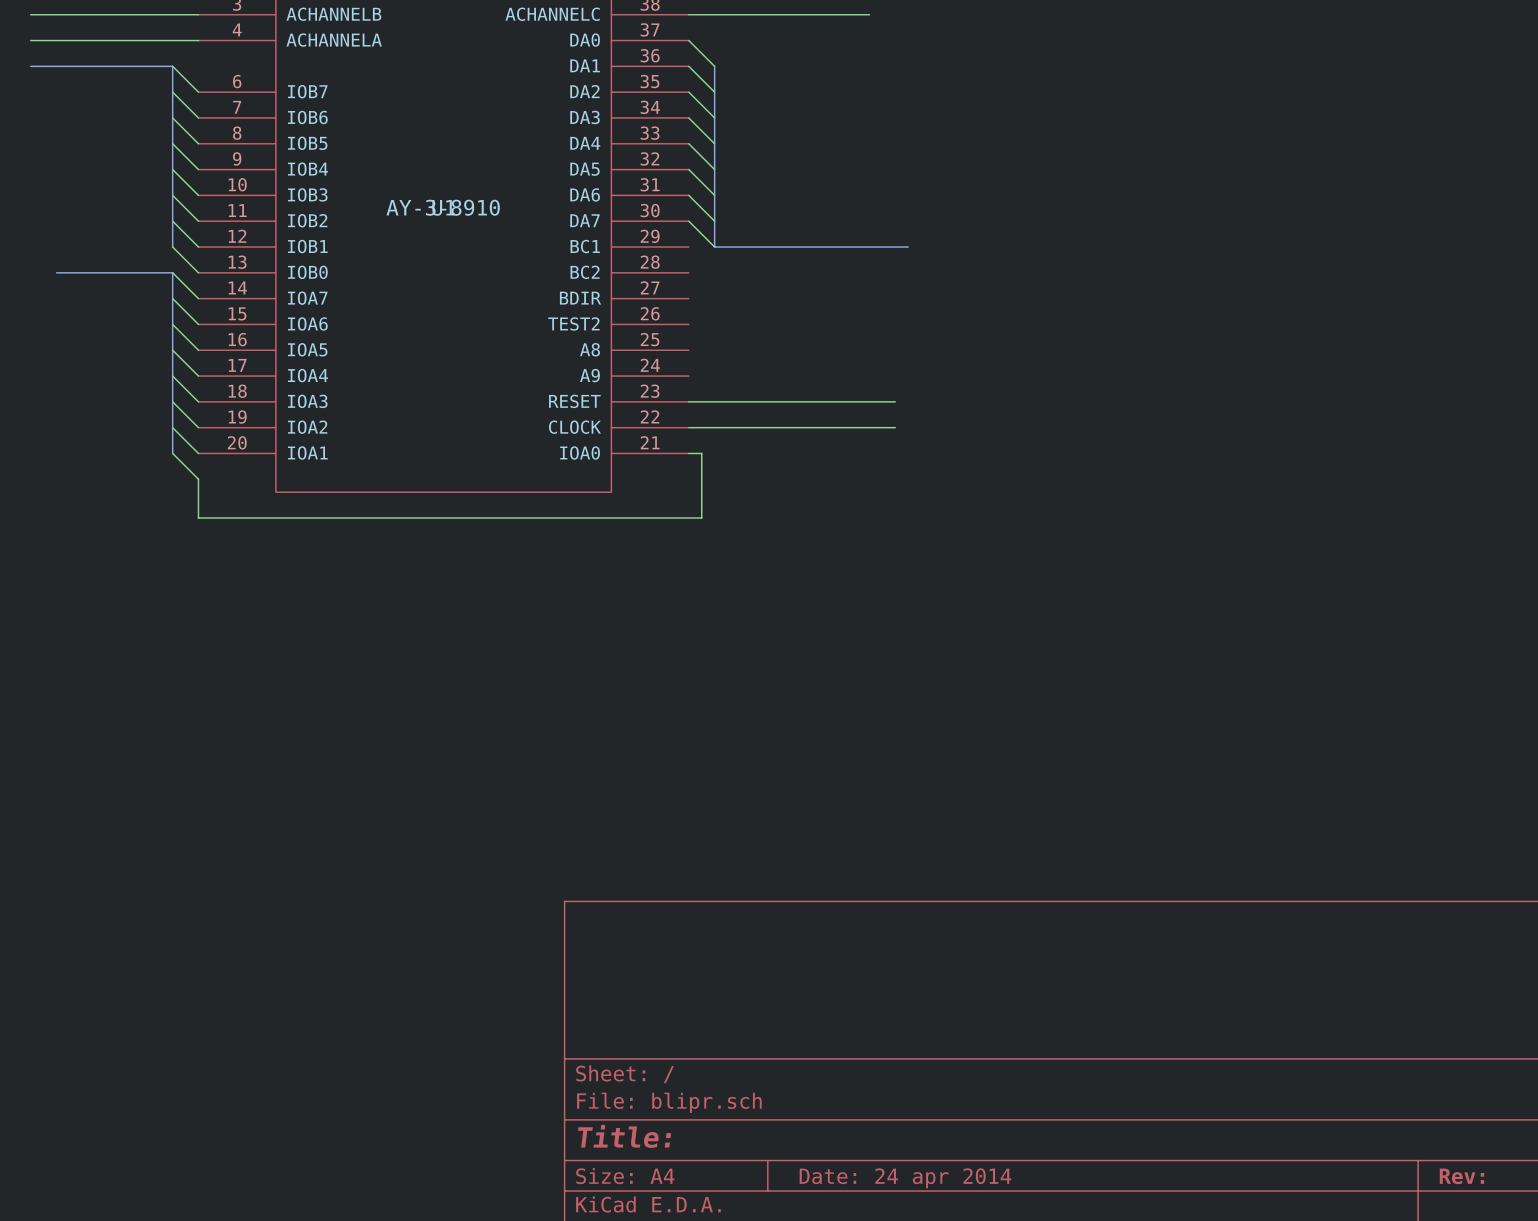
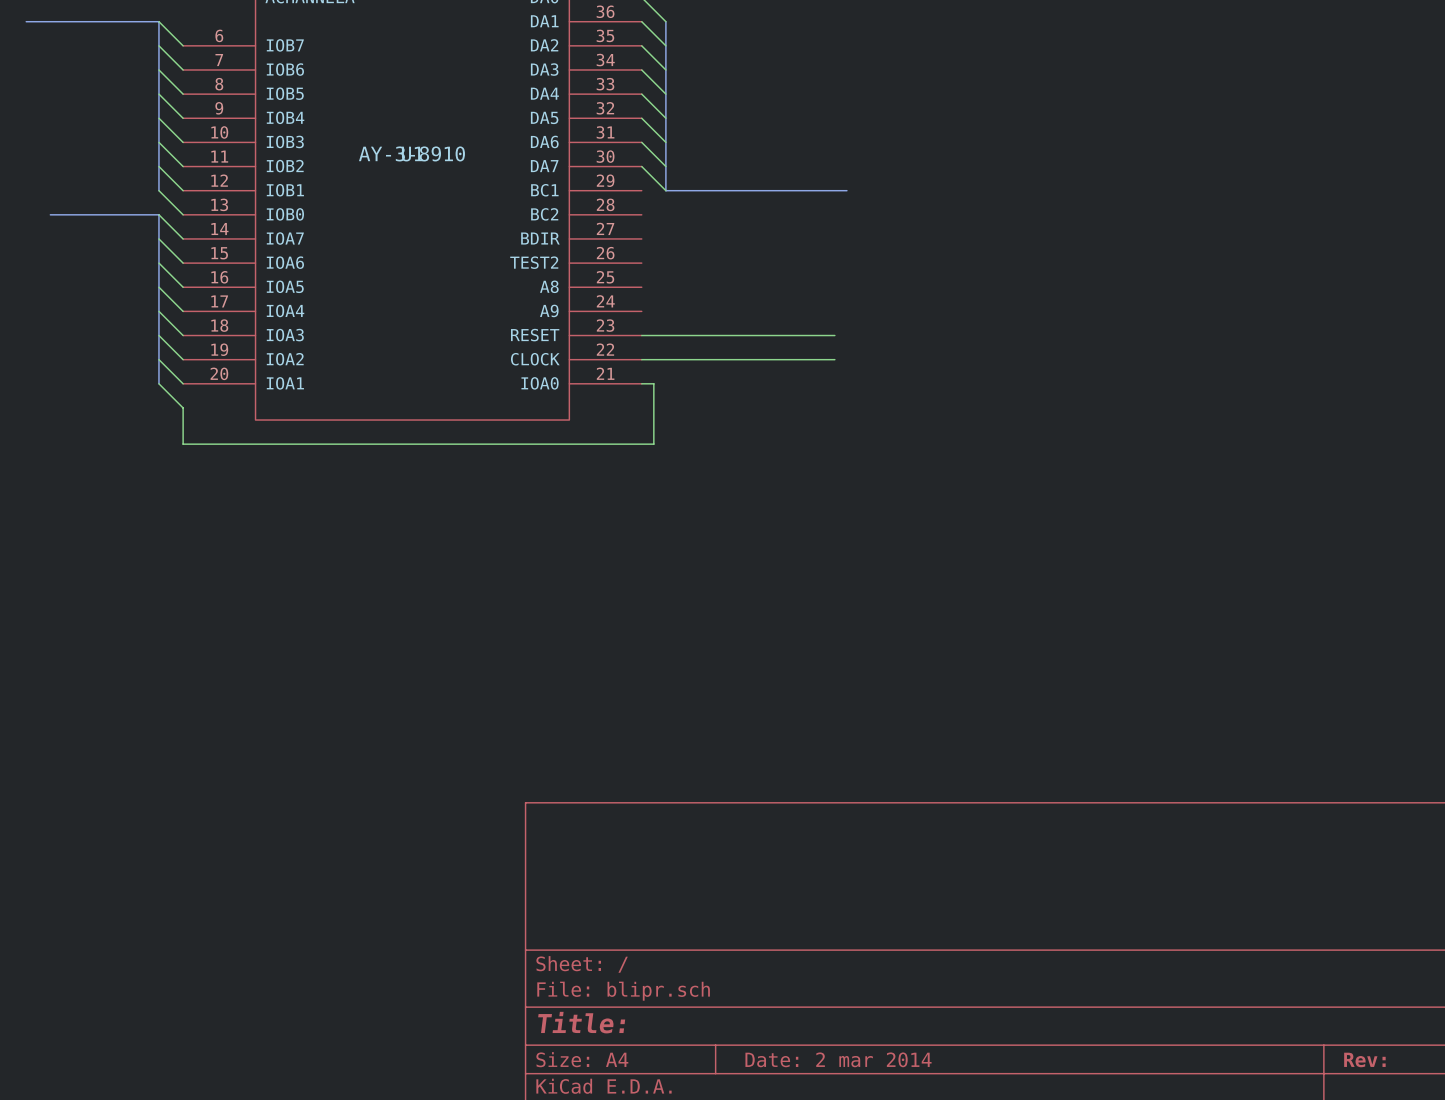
title block: Date: 24 apr 2014 (905, 1178) -> Date: 2 mar 2014 (838, 1059)

